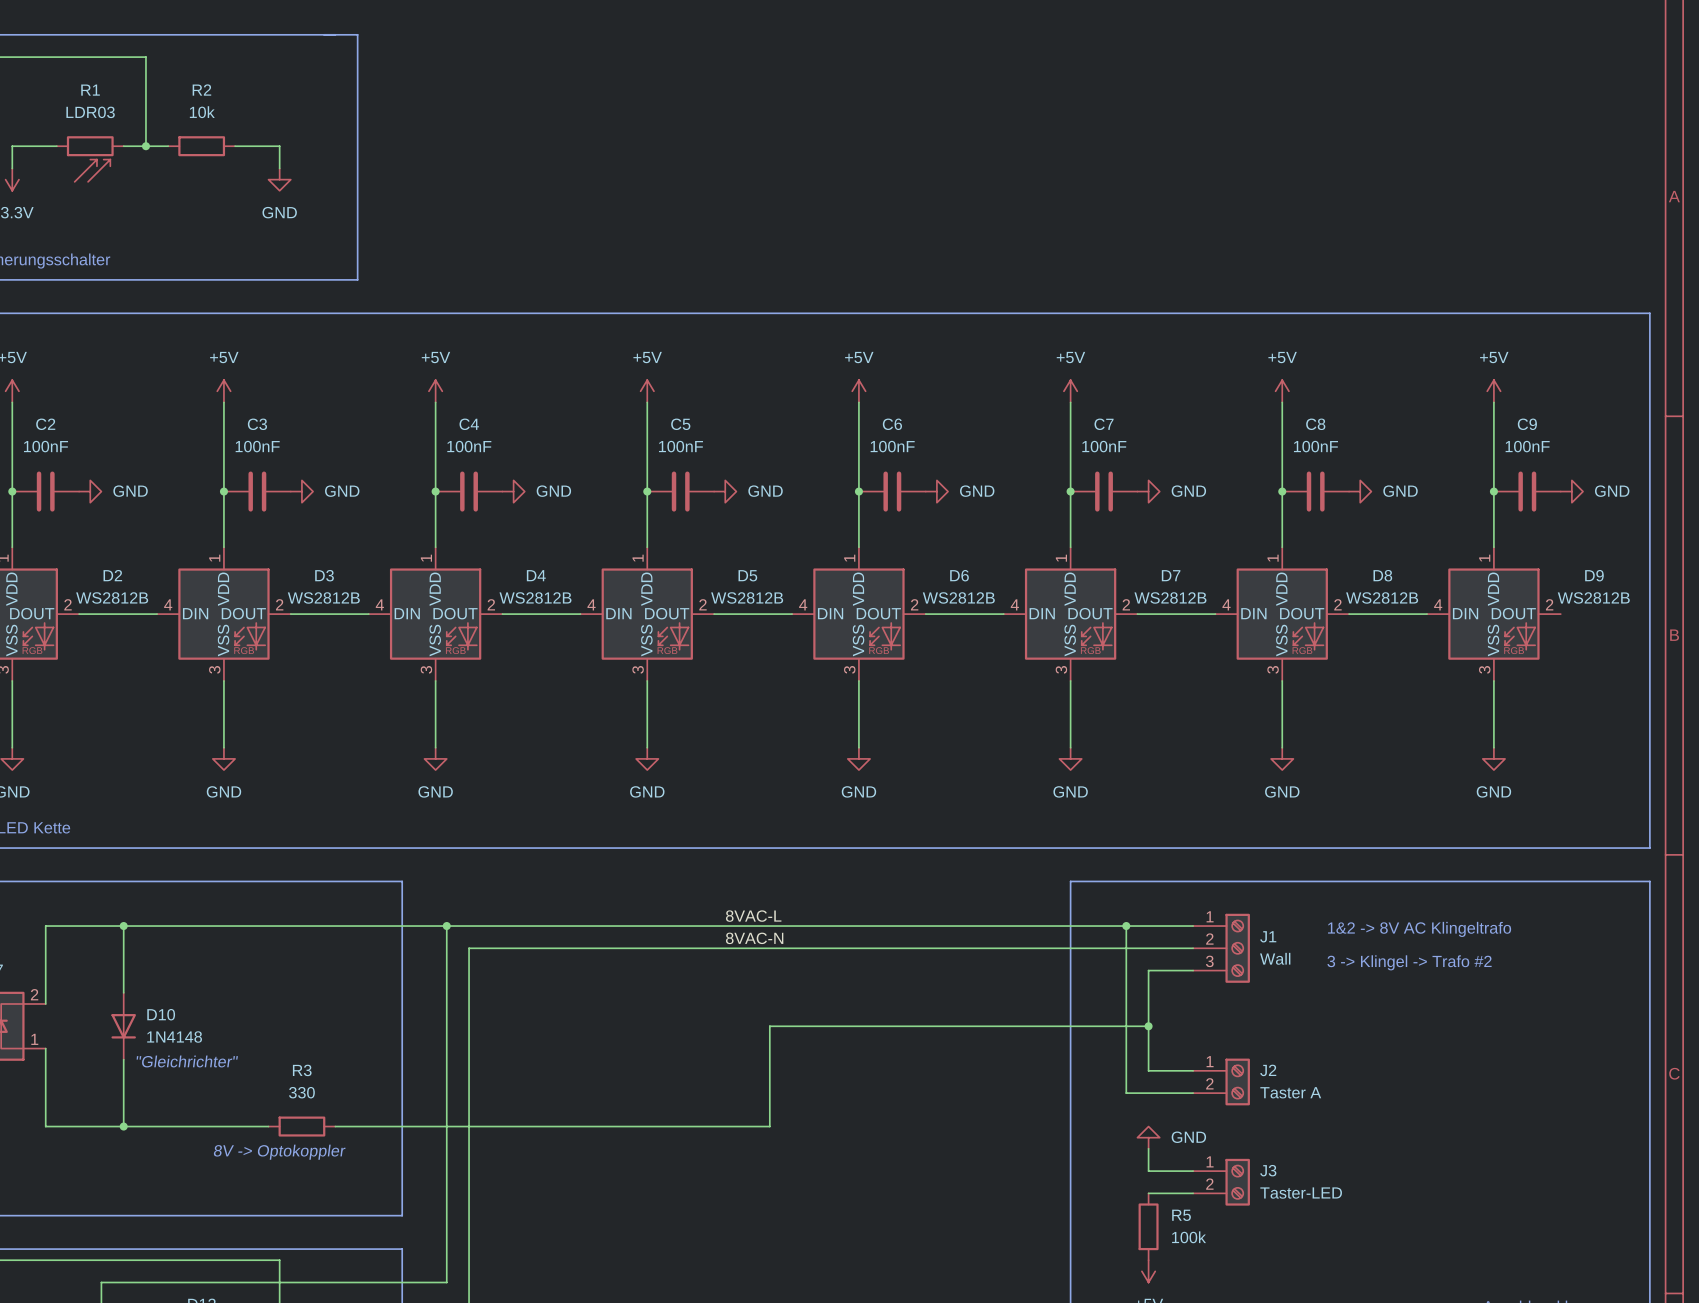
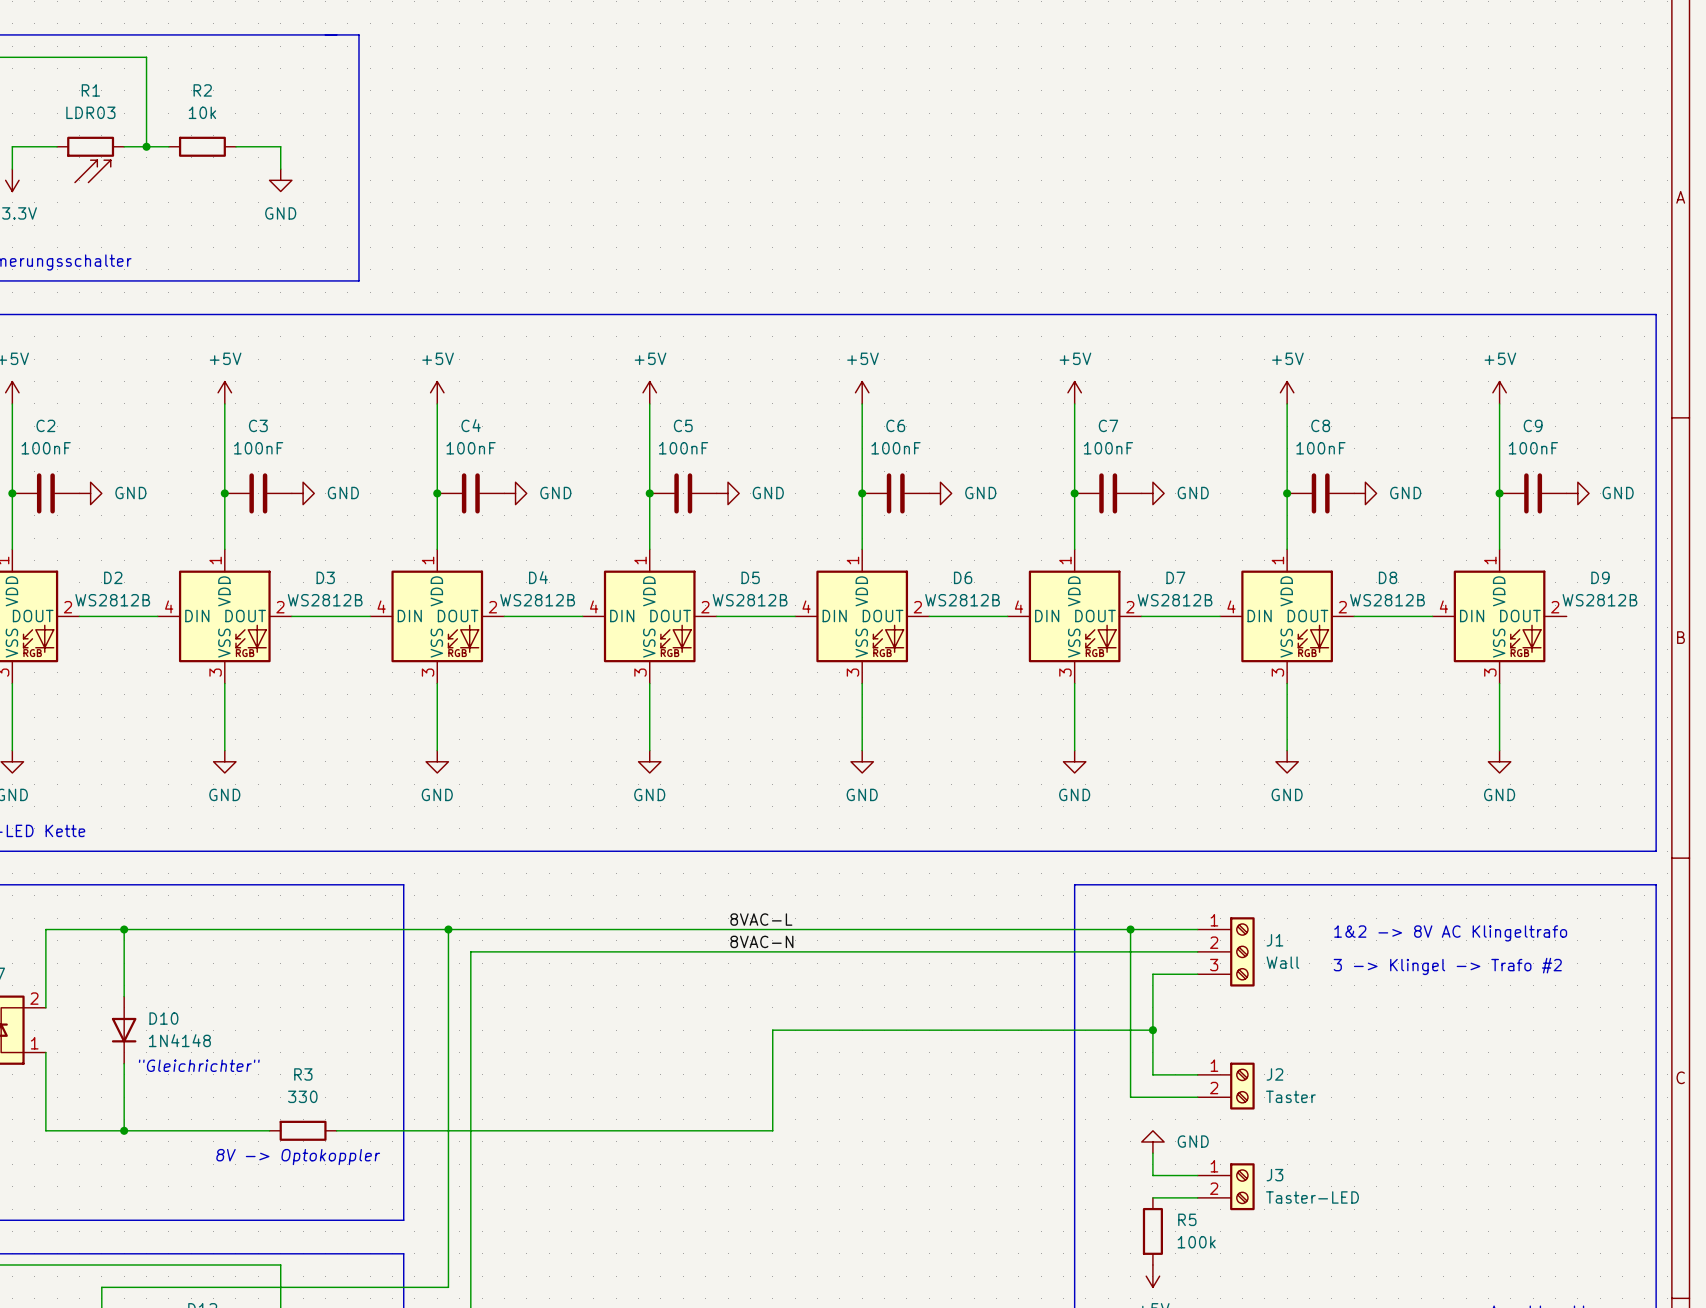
J2 value: Taster A (1290, 1092) -> Taster (1290, 1096)

